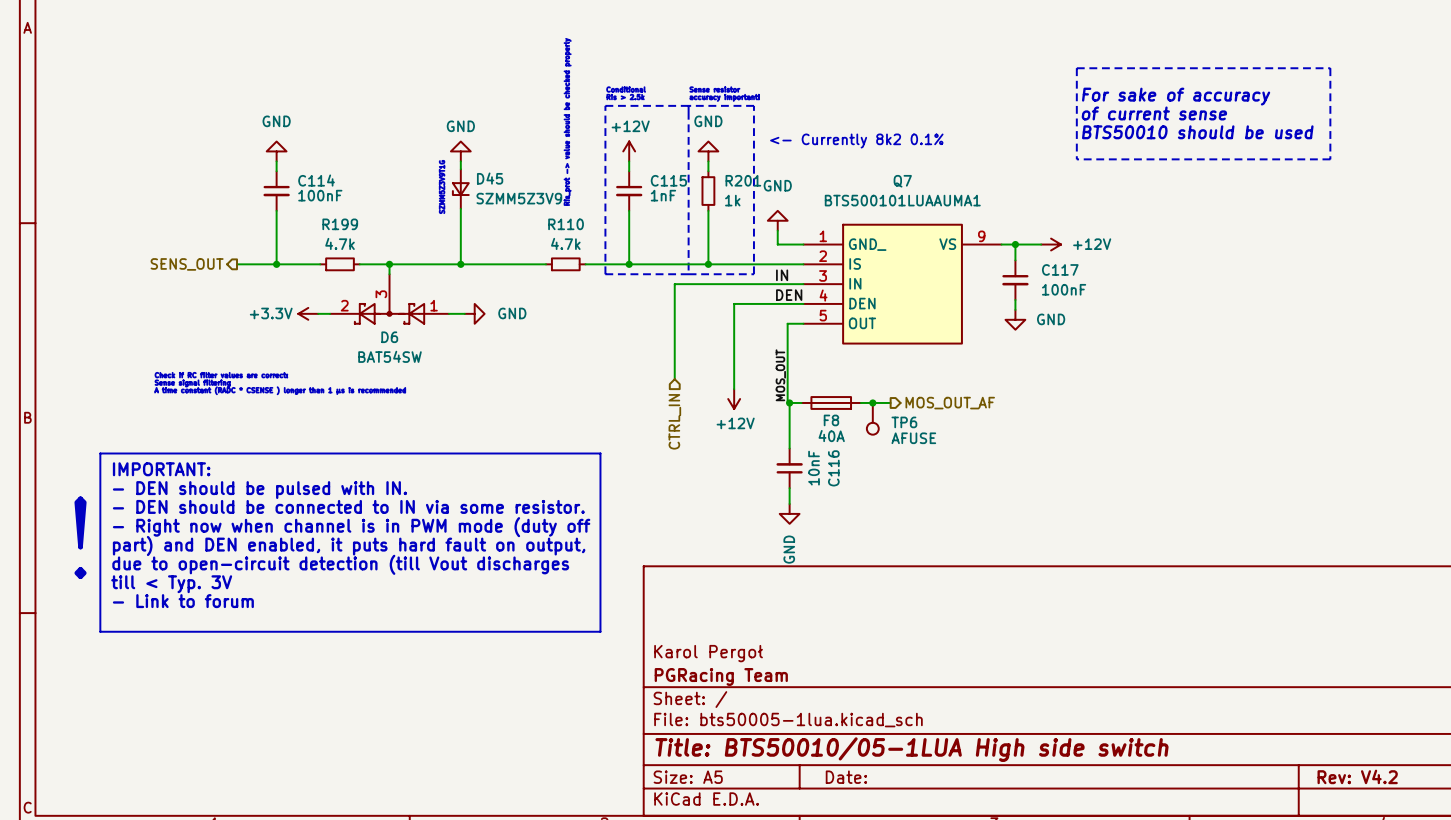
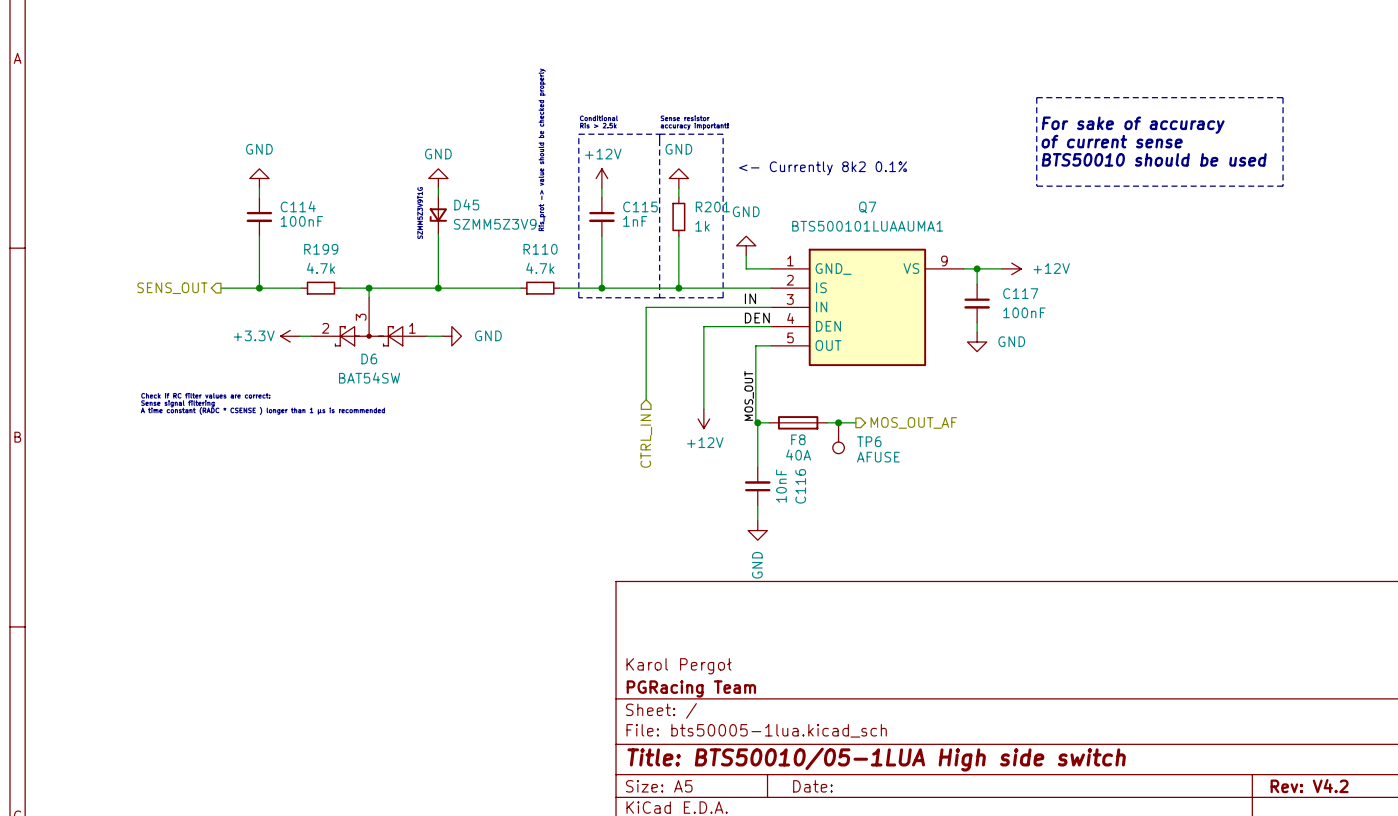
line: (100, 453) (600, 453) (600, 631) (100, 631) (100, 453) -> none
text: IMPORTANT: (161, 469) -> none
text: - DEN should be pulsed with IN. (259, 490) -> none
text: - DEN should be connected to IN via some resistor. (348, 506) -> none
text: - Right now when channel is in PWM mode (duty off (351, 527) -> none
text: ! (80, 537) -> none
text: part) and DEN enabled, it puts hard fault on output, (349, 545) -> none
text: due to open-circuit detection (till Vout discharges (340, 564) -> none
text: till < Typ. 3V (171, 584) -> none
text: - Link to forum (183, 601) -> none

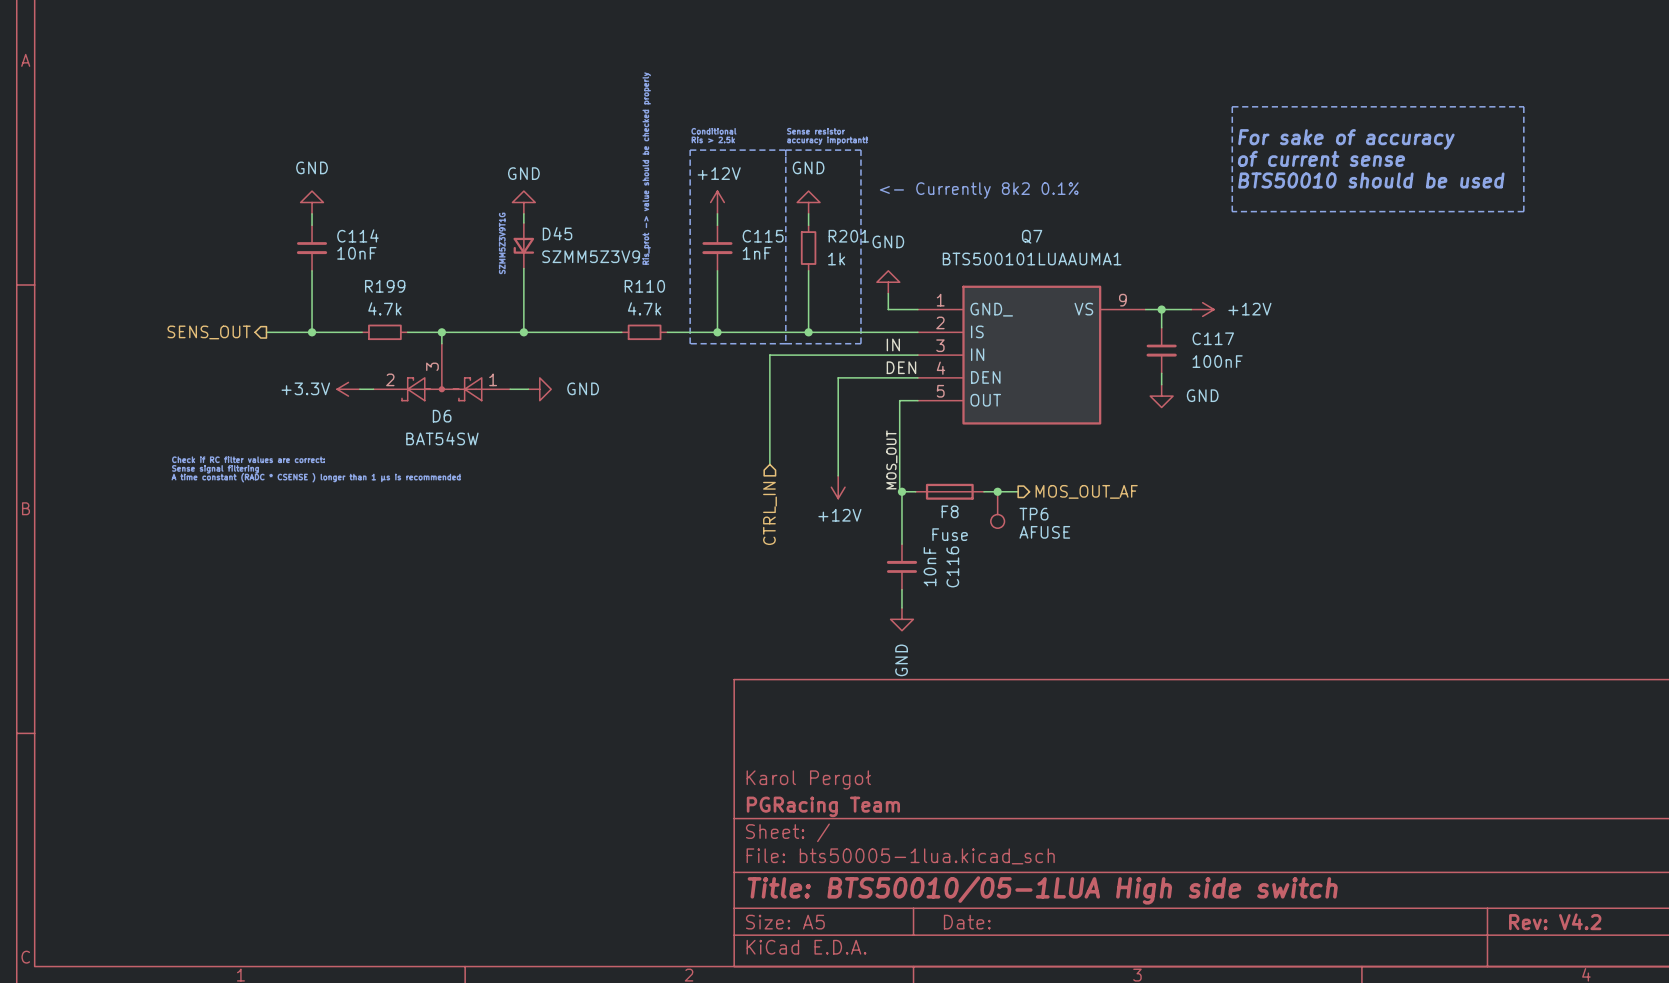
C114 value: 100nF (301, 221) -> 10nF (356, 253)
F8 value: 40A (798, 454) -> Fuse (950, 534)

